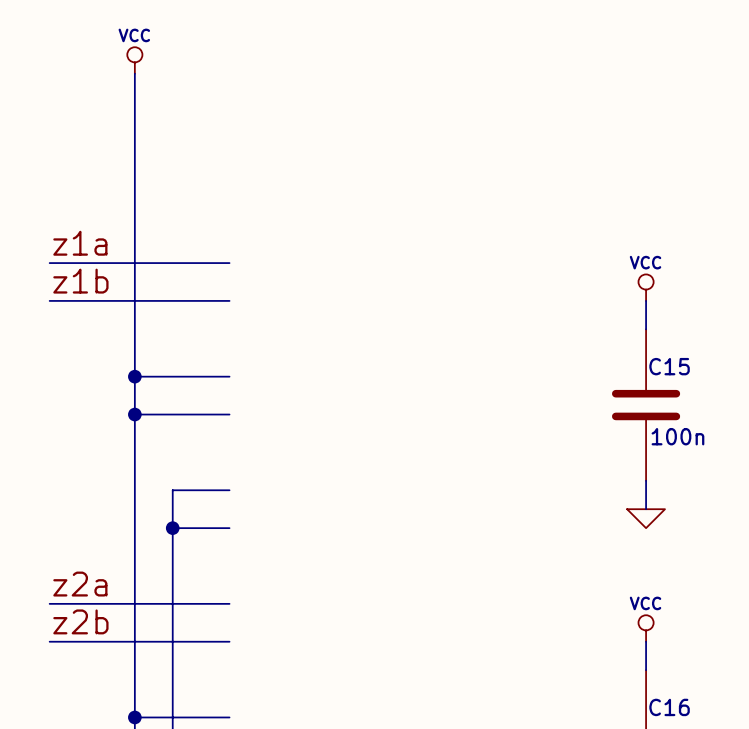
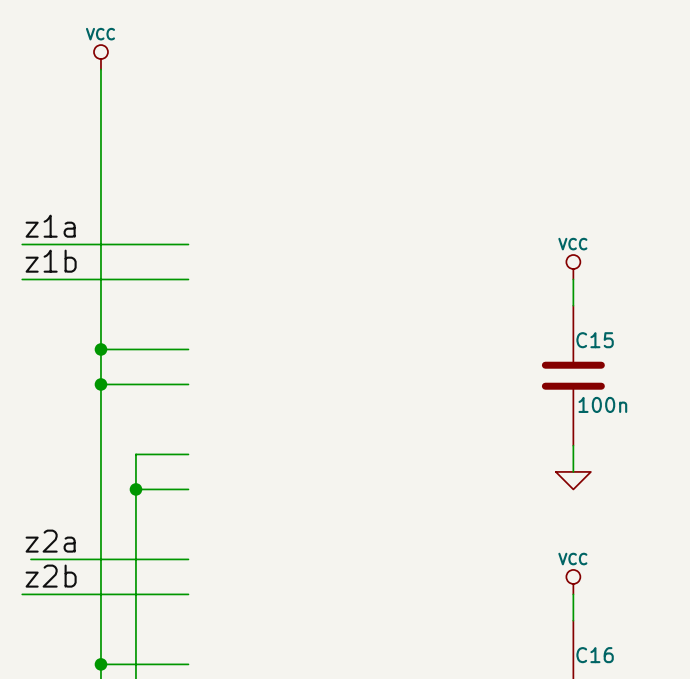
wire: (49, 603) (59, 603) -> none

